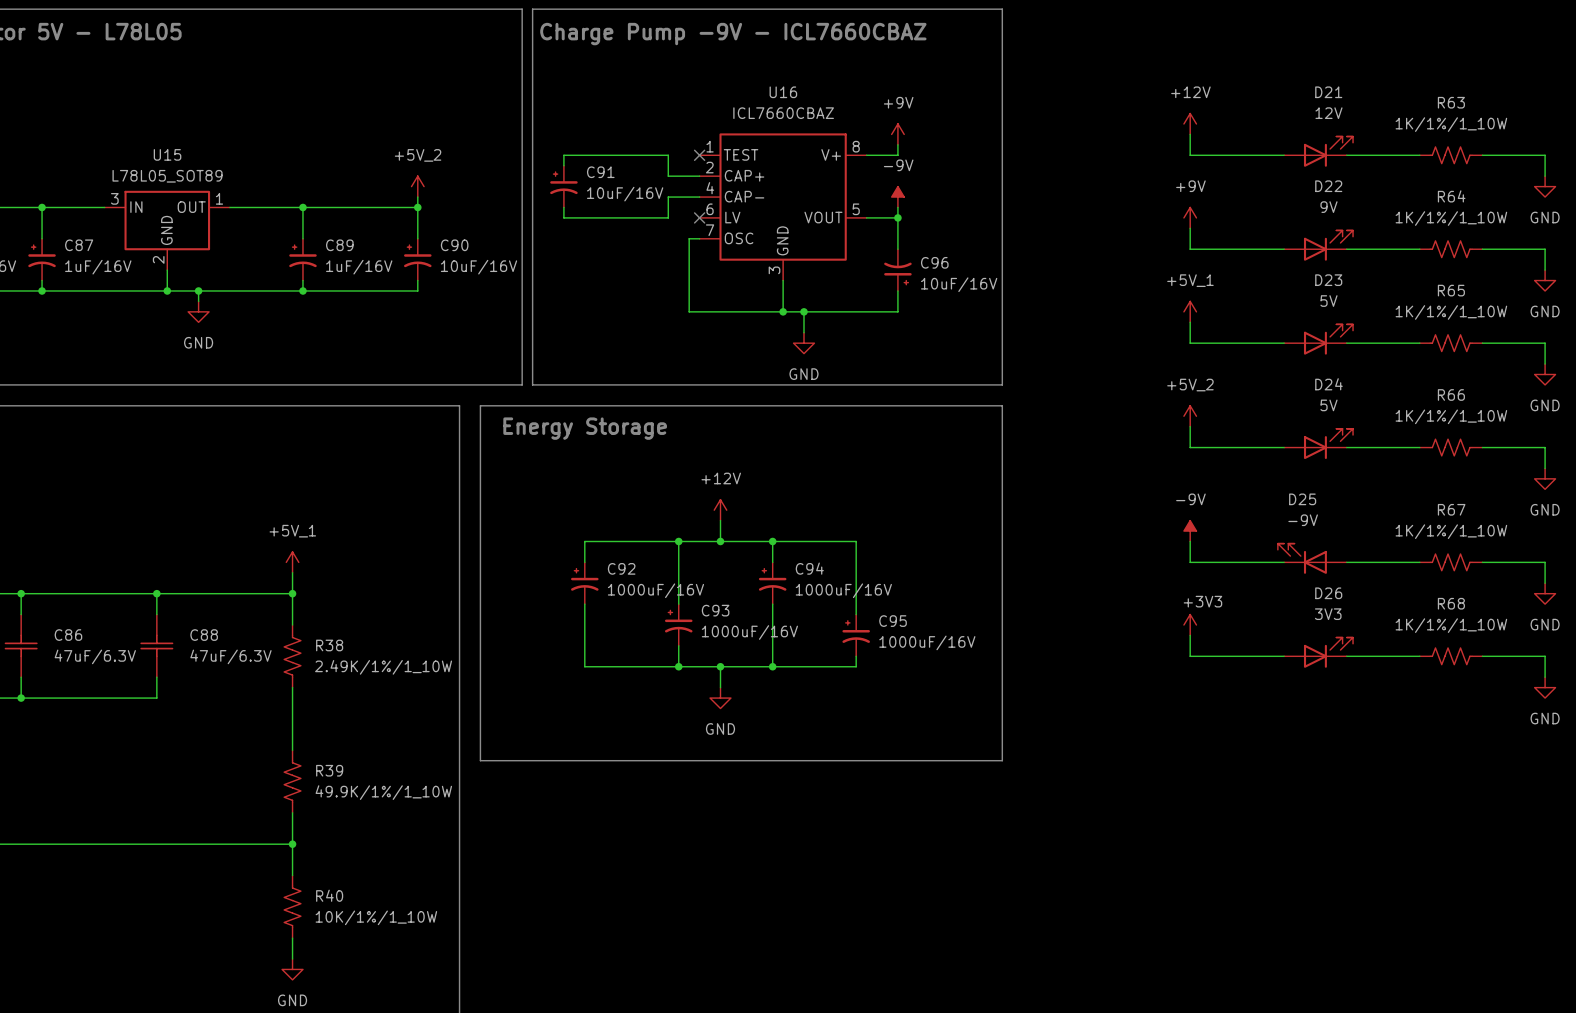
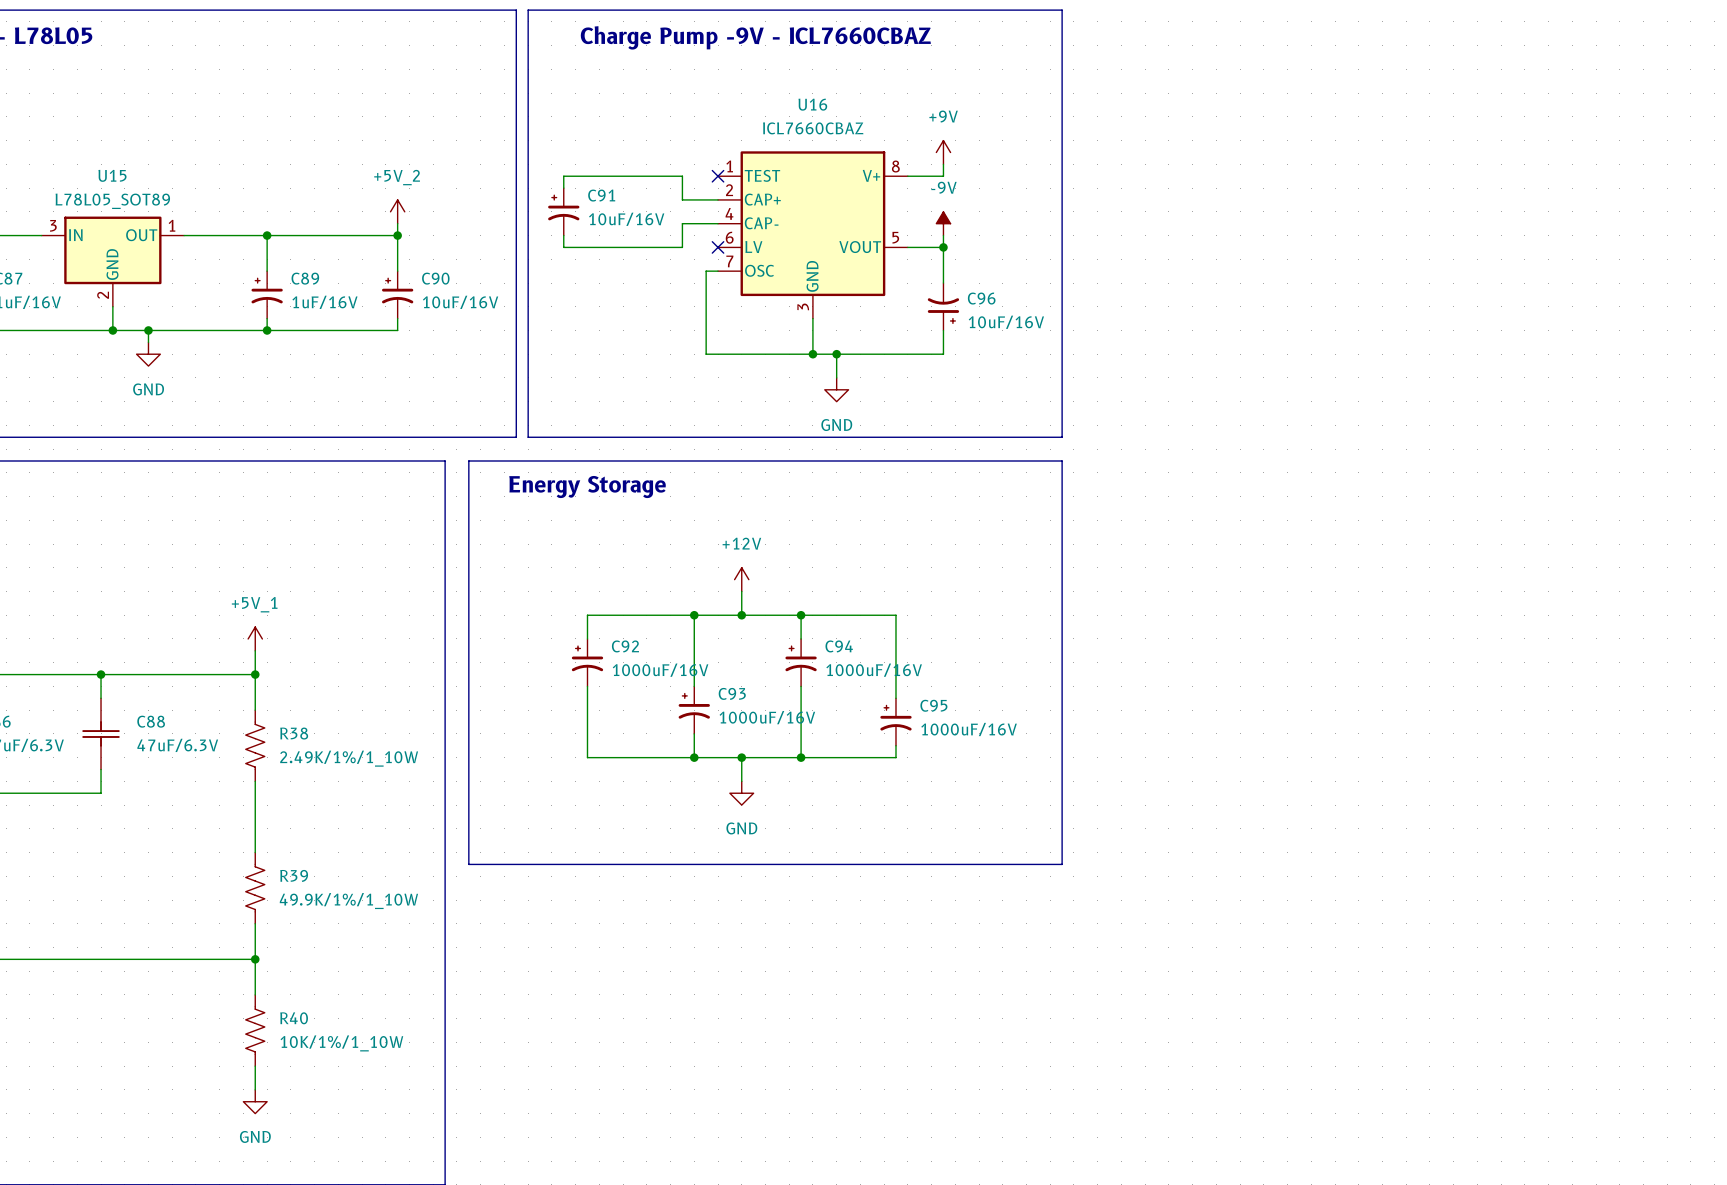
power symbol: +12V (1190, 123) -> none
wire: (1190, 134) (1190, 155) (1284, 155) -> none
D21: 12V (1318, 151) -> none
wire: (1346, 155) (1419, 155) -> none
R63: 1K/1%/1_10W (1451, 155) -> none
wire: (1482, 155) (1545, 155) (1545, 176) -> none
power symbol: GND (1545, 186) -> none
power symbol: +9V (1190, 217) -> none
wire: (1190, 228) (1190, 249) (1284, 249) -> none
D22: 9V (1318, 245) -> none
wire: (1346, 249) (1419, 249) -> none
R64: 1K/1%/1_10W (1451, 249) -> none
wire: (1482, 249) (1545, 249) (1545, 270) -> none
power symbol: GND (1545, 280) -> none
power symbol: +5V_1 (1190, 311) -> none
wire: (1190, 322) (1190, 343) (1284, 343) -> none
D23: 5V (1318, 339) -> none
wire: (1346, 343) (1419, 343) -> none
R65: 1K/1%/1_10W (1451, 343) -> none
wire: (1482, 343) (1545, 343) (1545, 364) -> none
power symbol: GND (1545, 374) -> none
power symbol: +5V_2 (1190, 416) -> none
wire: (1190, 426) (1190, 447) (1284, 447) -> none
D24: 5V (1318, 443) -> none
wire: (1346, 447) (1419, 447) -> none
R66: 1K/1%/1_10W (1451, 447) -> none
wire: (1482, 447) (1545, 447) (1545, 468) -> none
power symbol: GND (1545, 478) -> none
power symbol: -9V (1190, 531) -> none
wire: (1190, 541) (1190, 562) (1284, 562) -> none
D25: -9V (1312, 558) -> none
wire: (1346, 562) (1419, 562) -> none
R67: 1K/1%/1_10W (1451, 562) -> none
wire: (1482, 562) (1545, 562) (1545, 583) -> none
power symbol: GND (1545, 593) -> none
power symbol: +3V3 (1190, 625) -> none
wire: (1190, 635) (1190, 656) (1284, 656) -> none
D26: 3V3 (1318, 652) -> none
wire: (1346, 656) (1419, 656) -> none
R68: 1K/1%/1_10W (1451, 656) -> none
wire: (1482, 656) (1545, 656) (1545, 677) -> none
power symbol: GND (1545, 687) -> none

